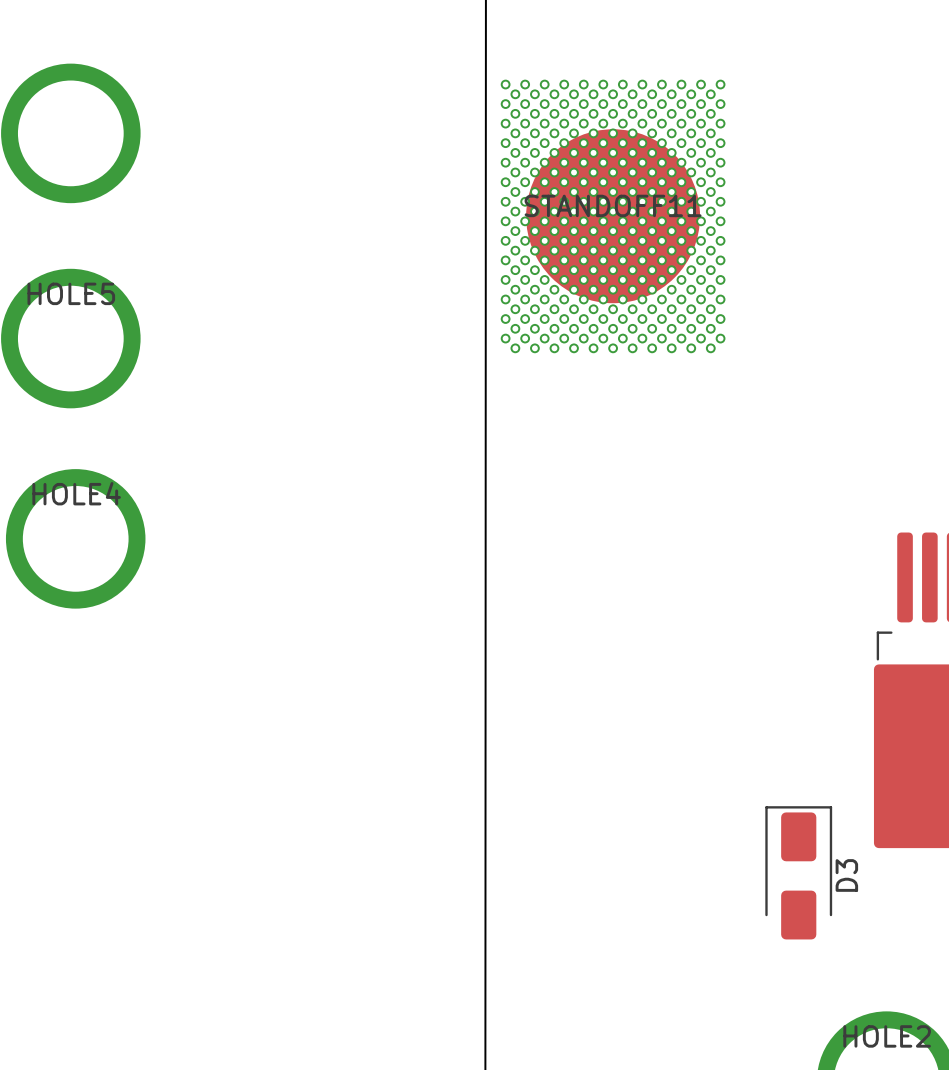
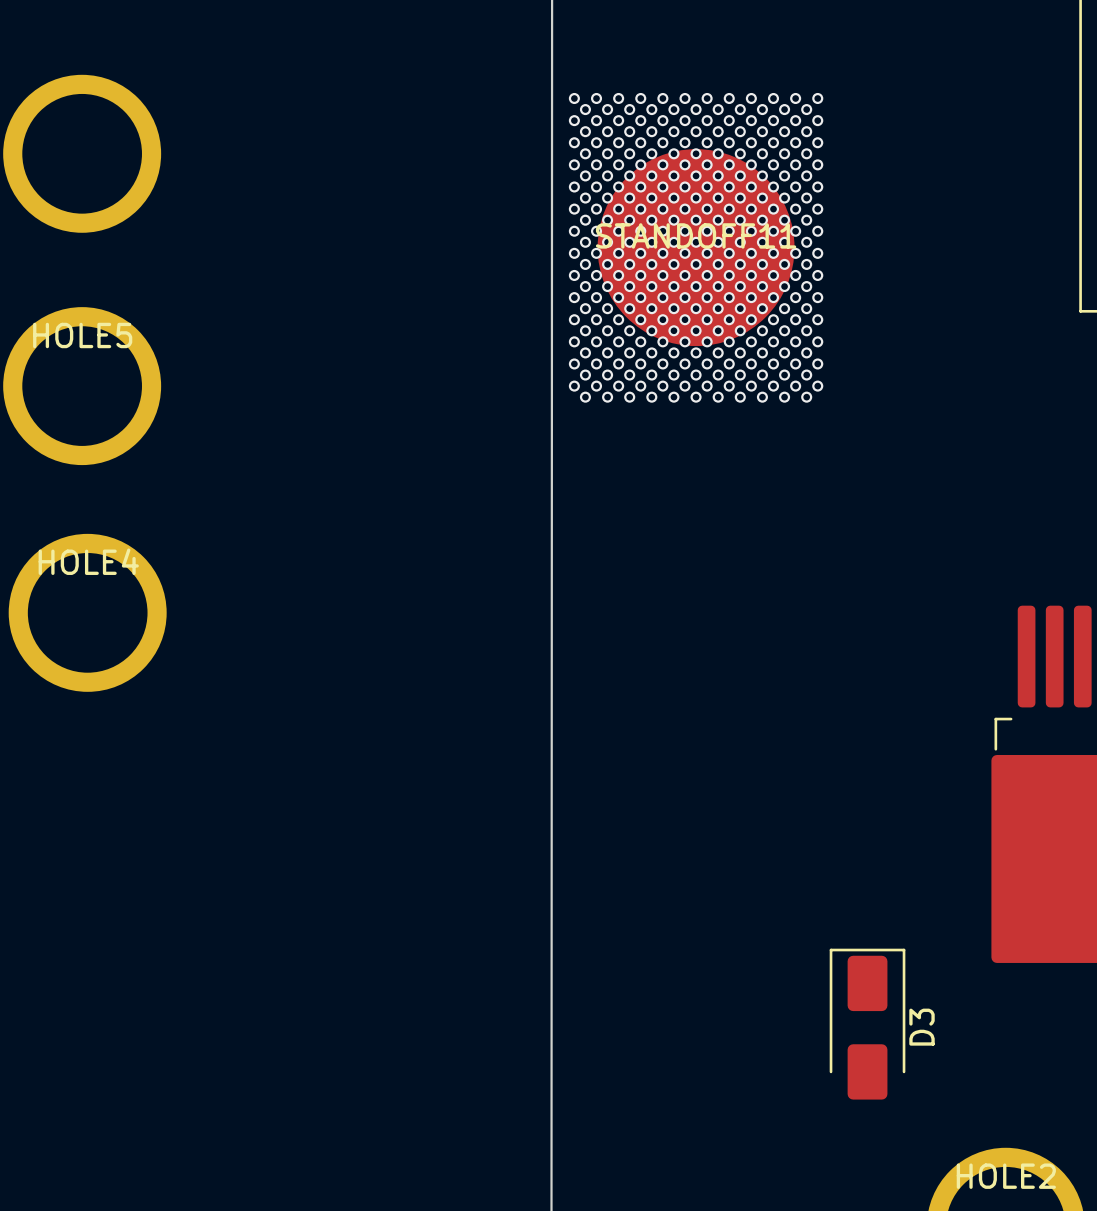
D3 position: (798, 872) -> (867, 1024)

